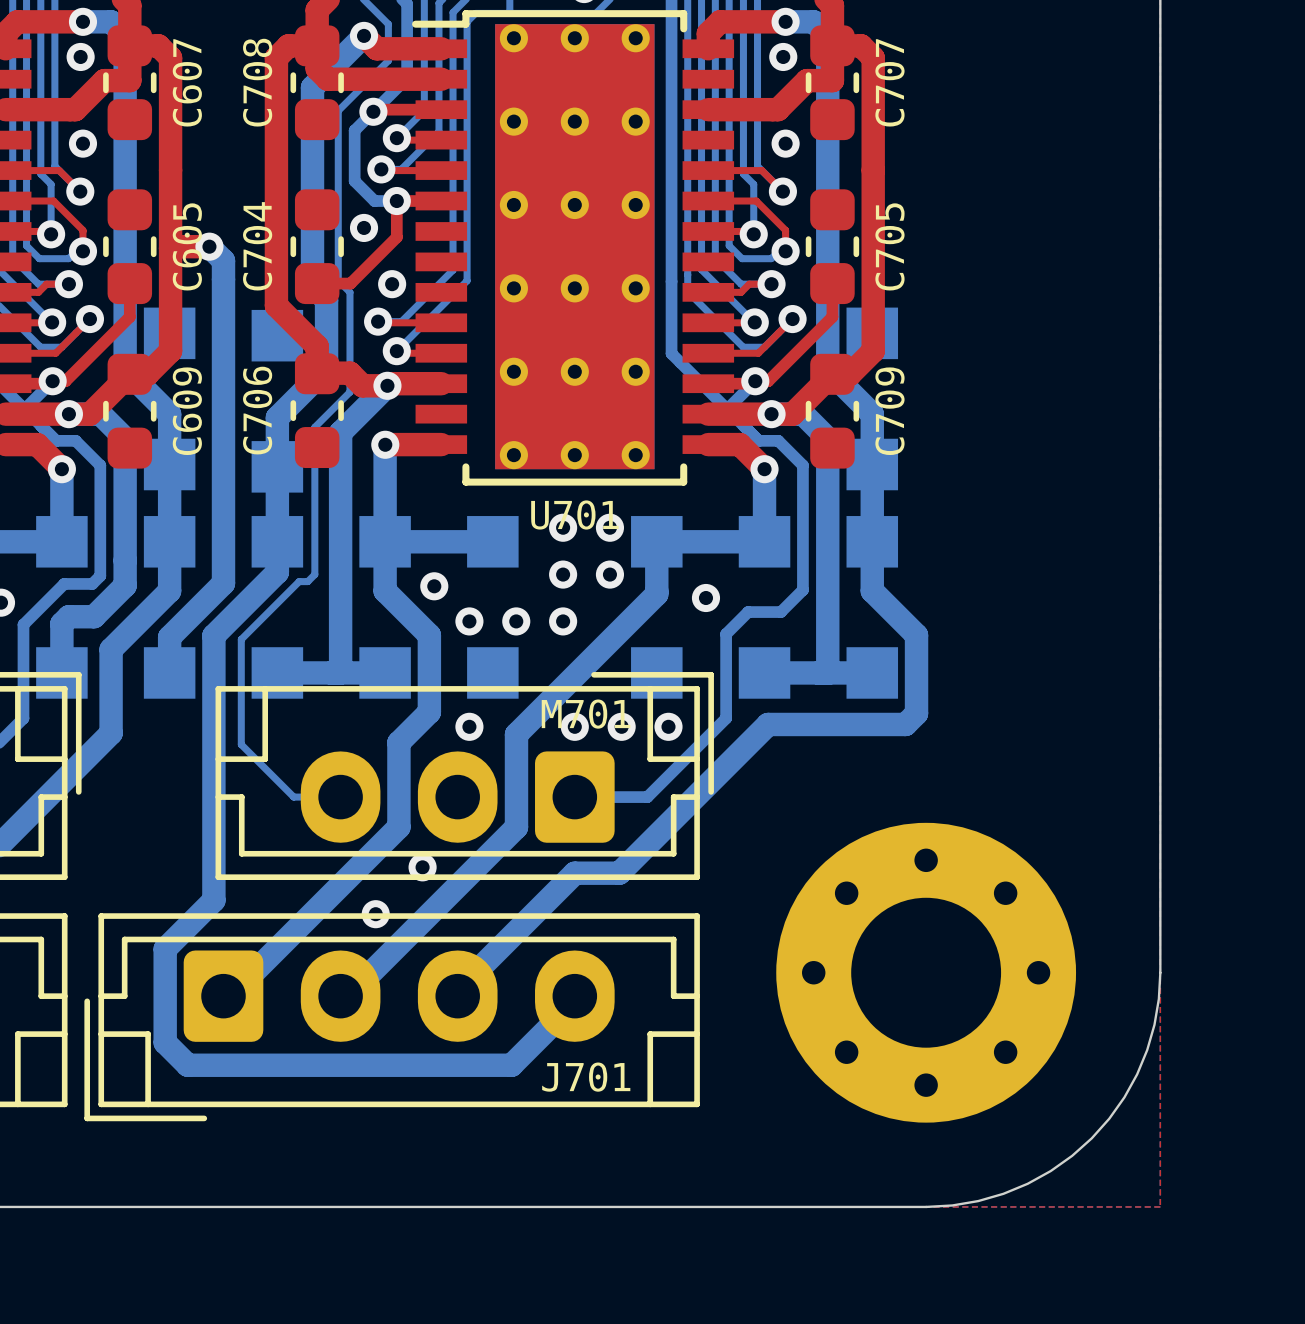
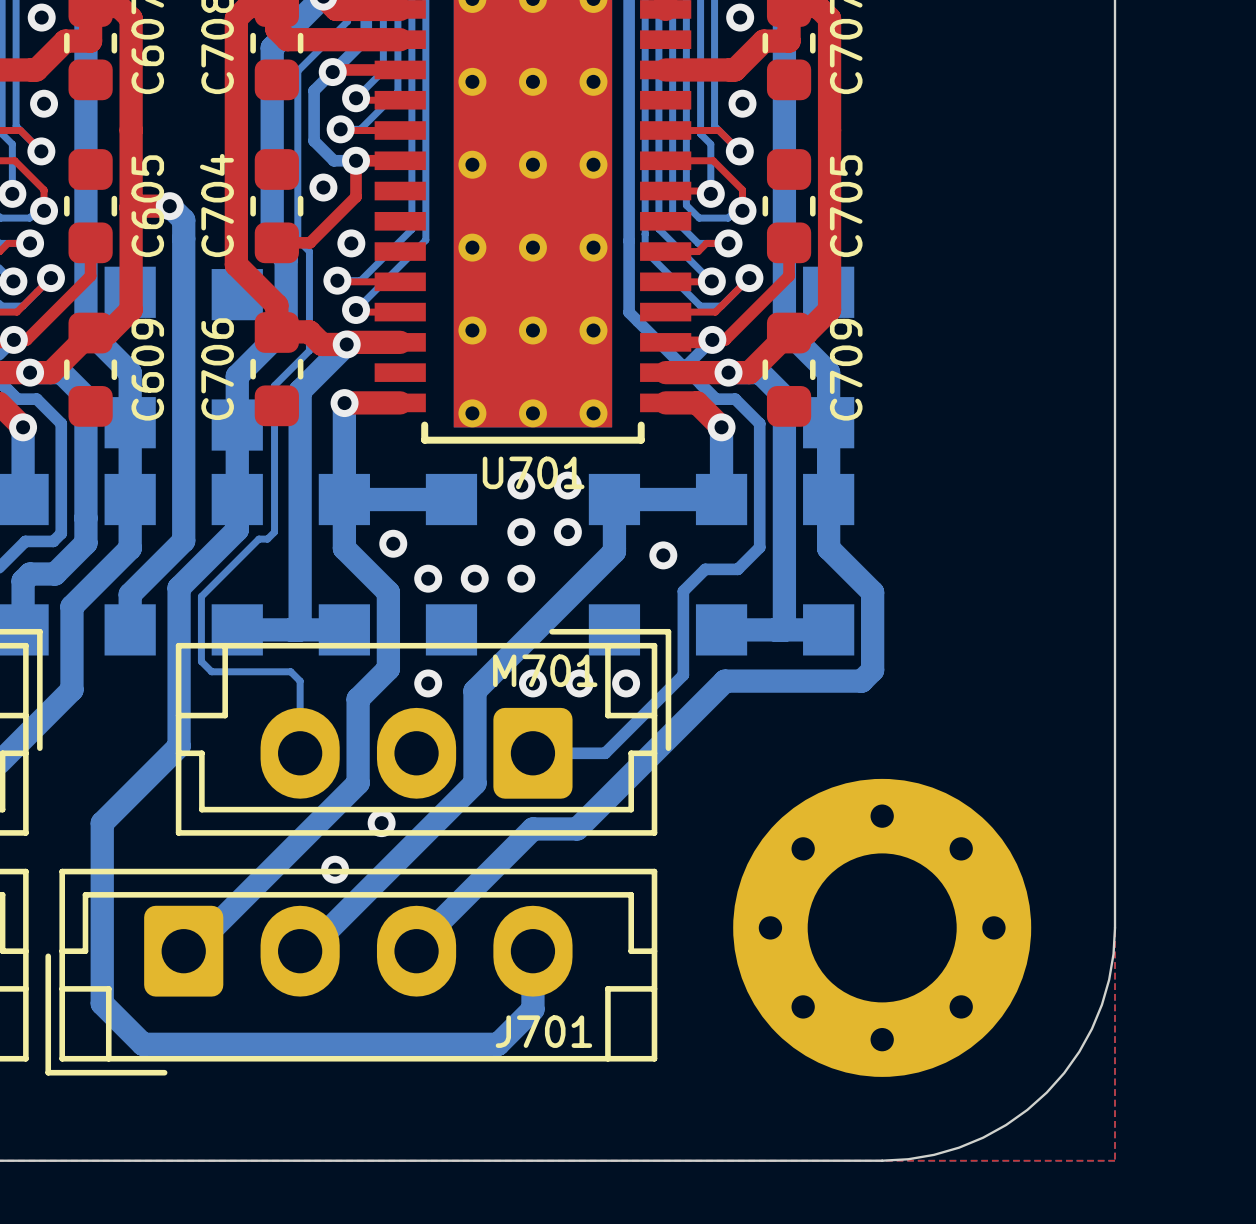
bottom track: (218, 630) (213, 635) (213, 900) (165, 949) (165, 1042) (187, 1065) (511, 1065) (574, 1002) -> (179, 587) (179, 746) (102, 823) (102, 1003) (142, 1044) (498, 1044) (532, 1009) (532, 957)
bottom track: (241, 704) (241, 744) (293, 797) (340, 797) -> (201, 661) (211, 671) (290, 671) (300, 681) (300, 753)

